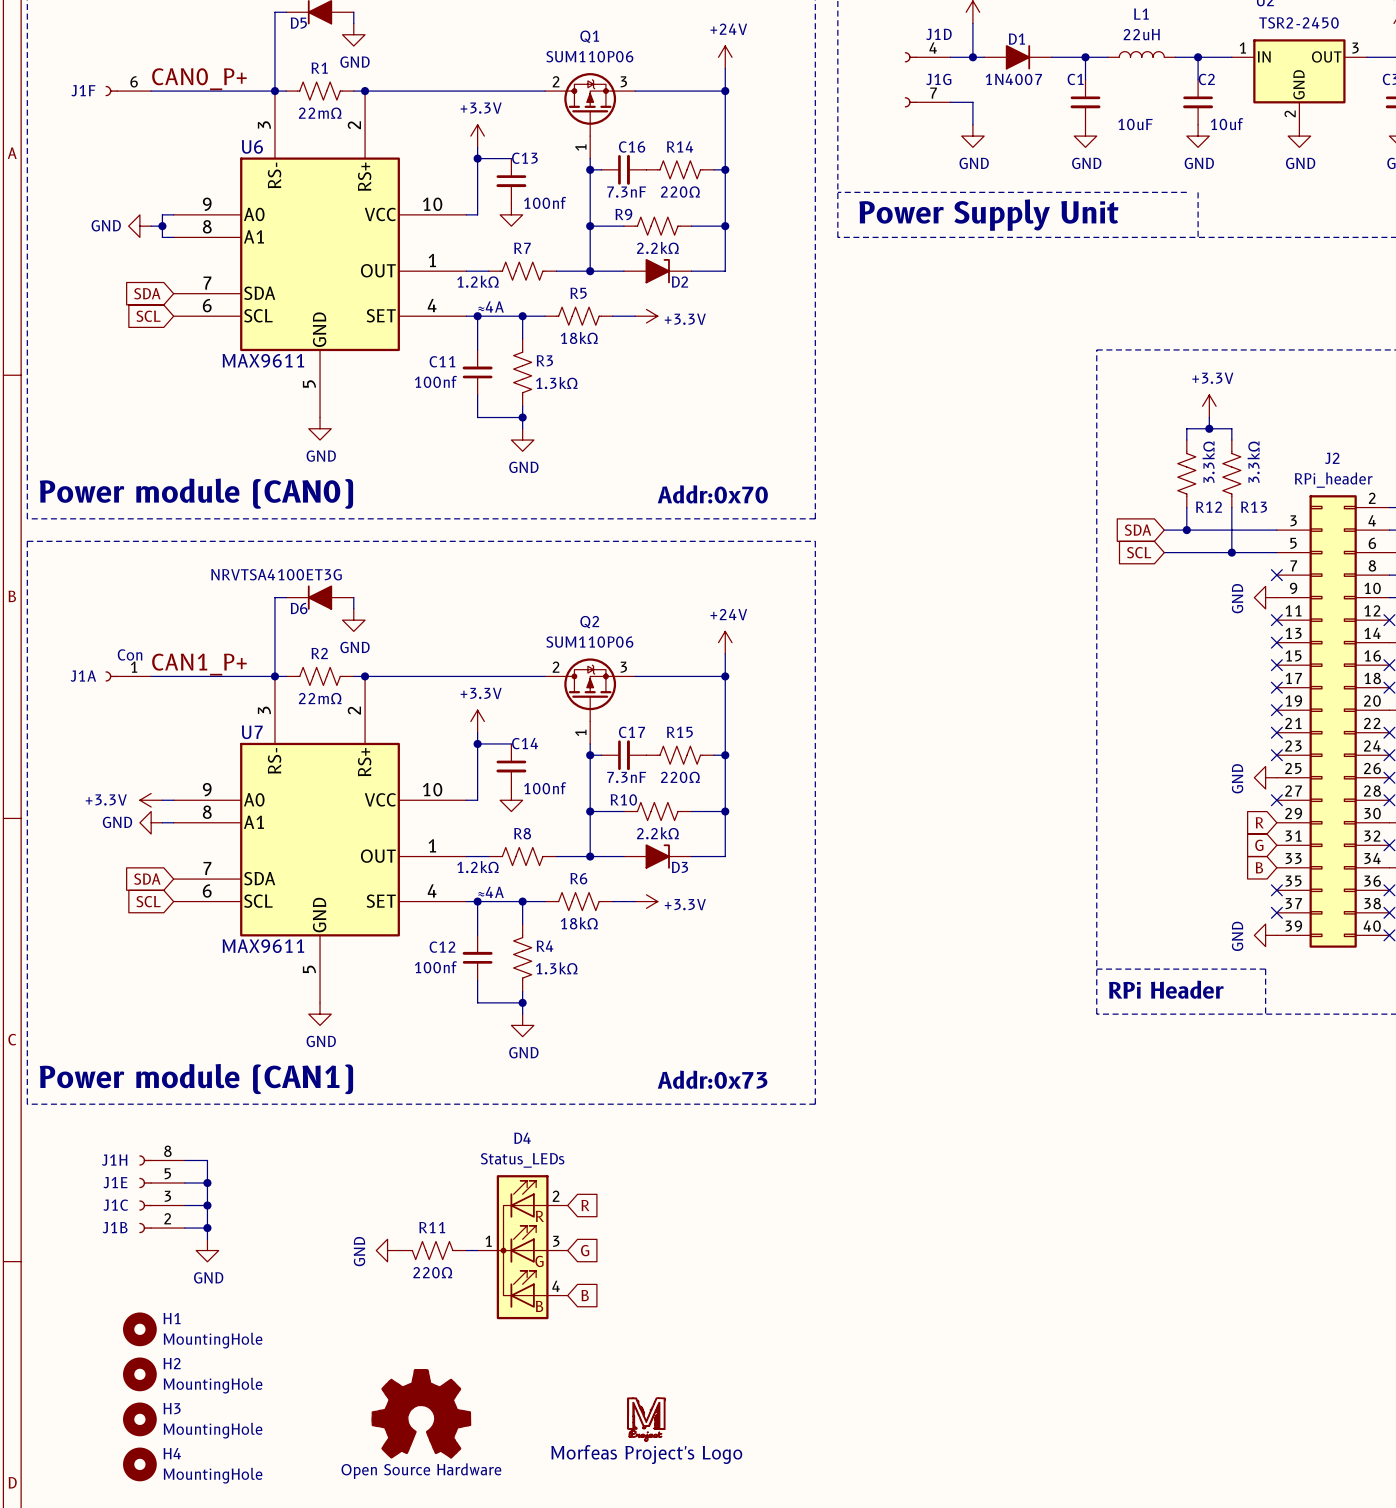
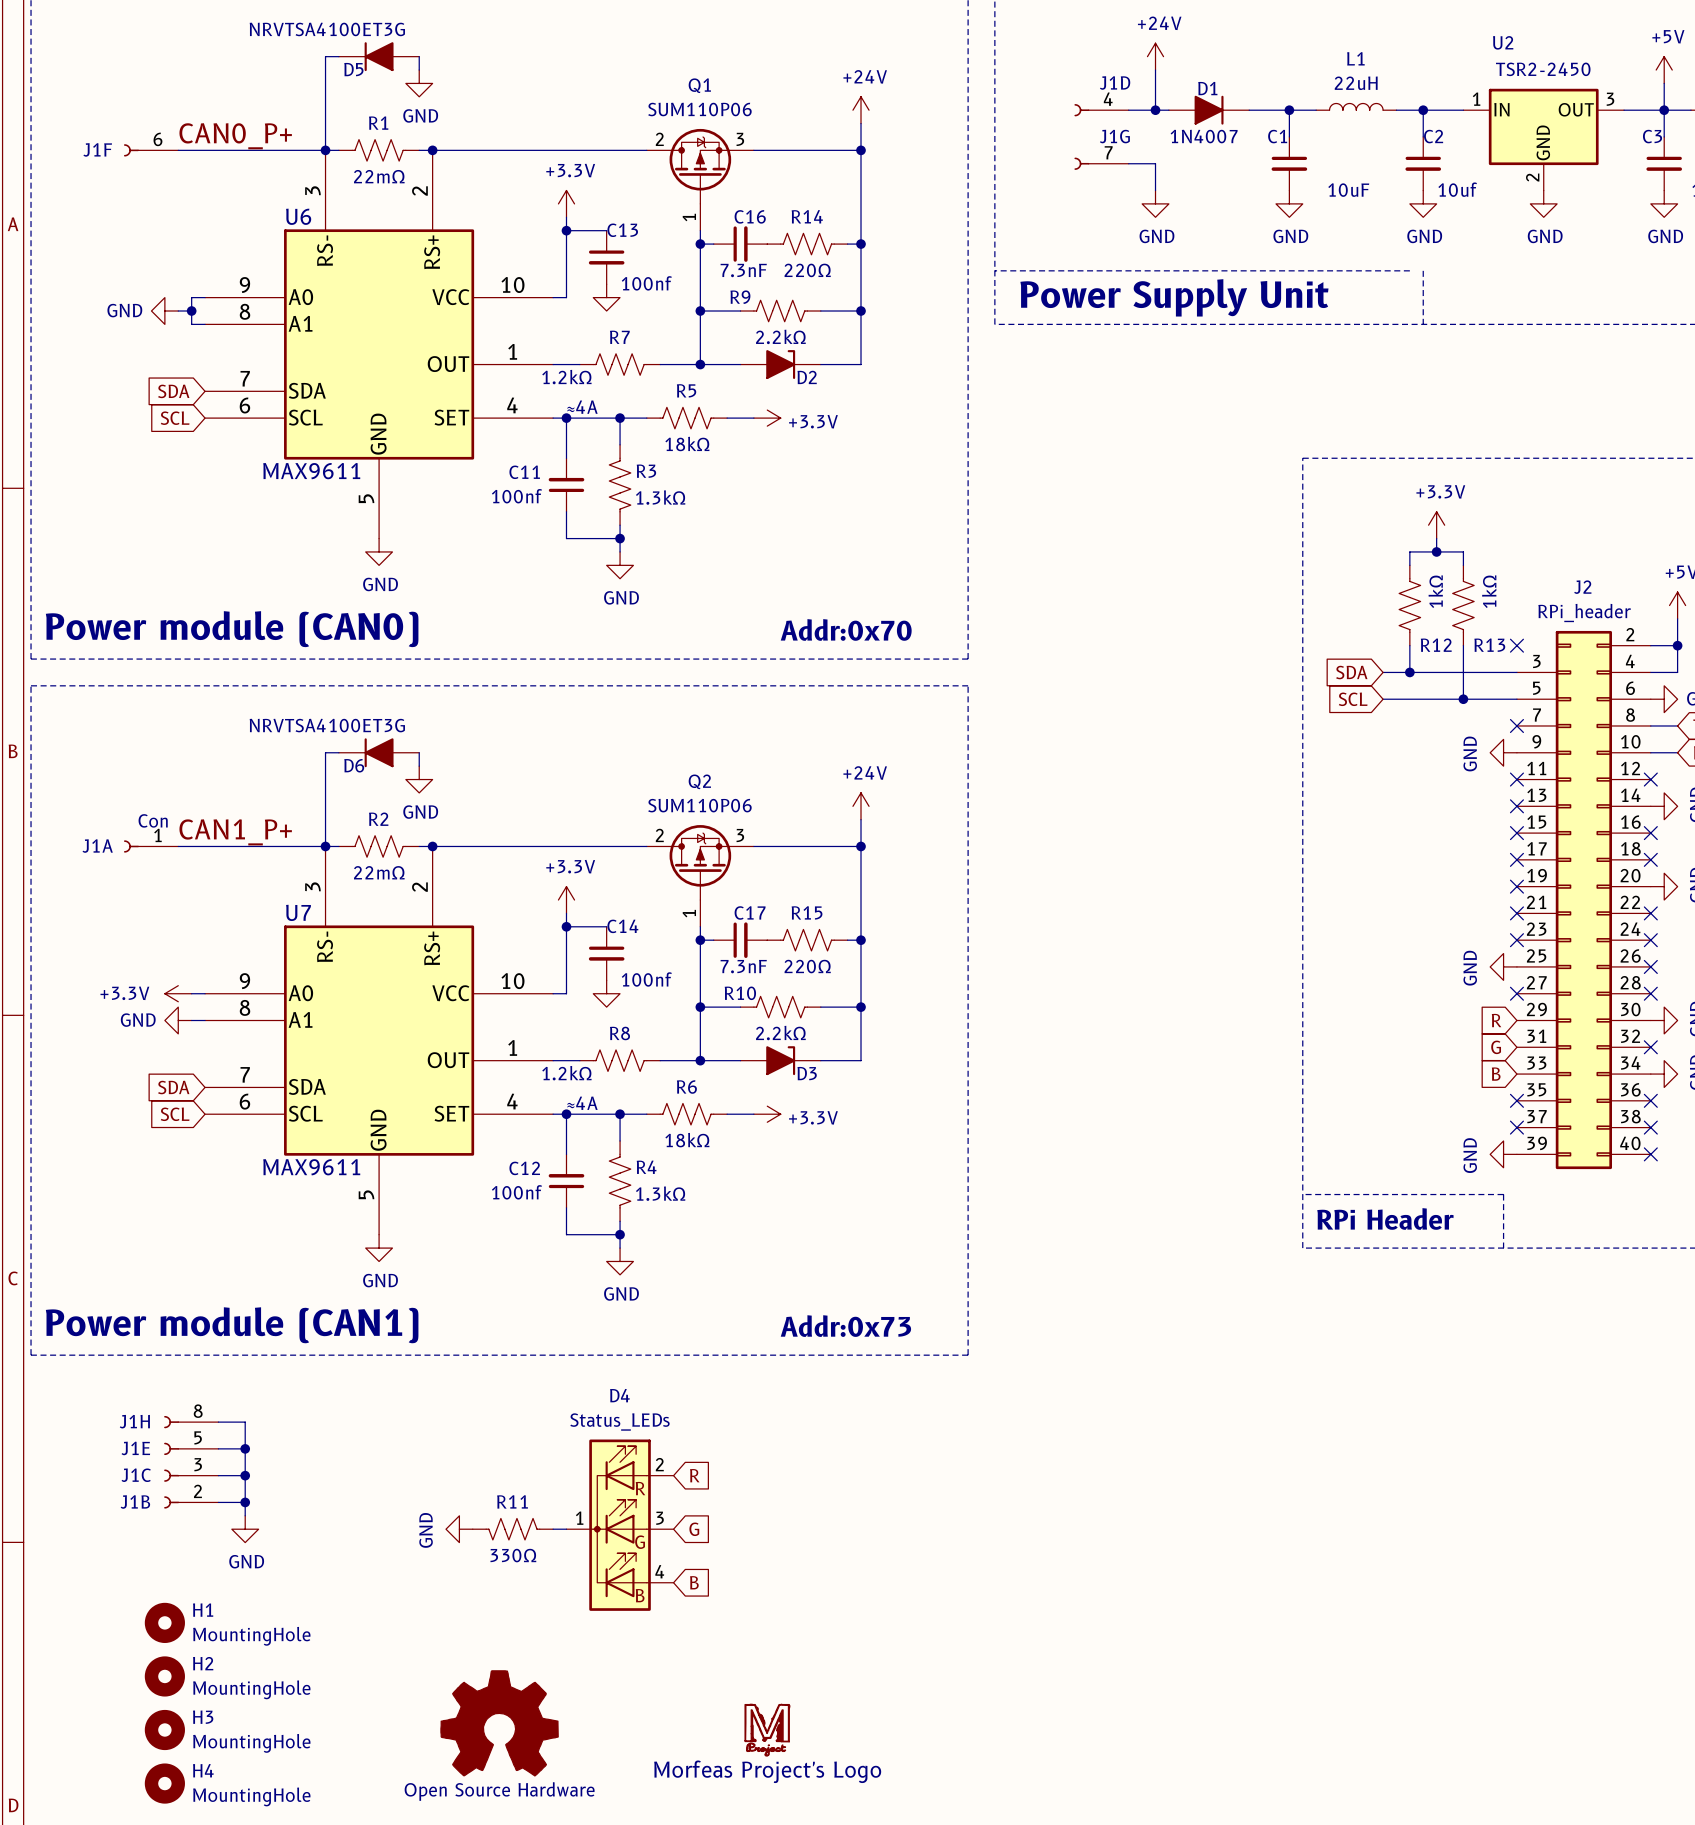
R12 value: 3.3kΩ (1208, 462) -> 1kΩ (1435, 591)
R13 value: 3.3kΩ (1253, 462) -> 1kΩ (1489, 591)
no-connect mark: none -> (1516, 645)
R11 value: 220Ω (432, 1272) -> 330Ω (513, 1555)

